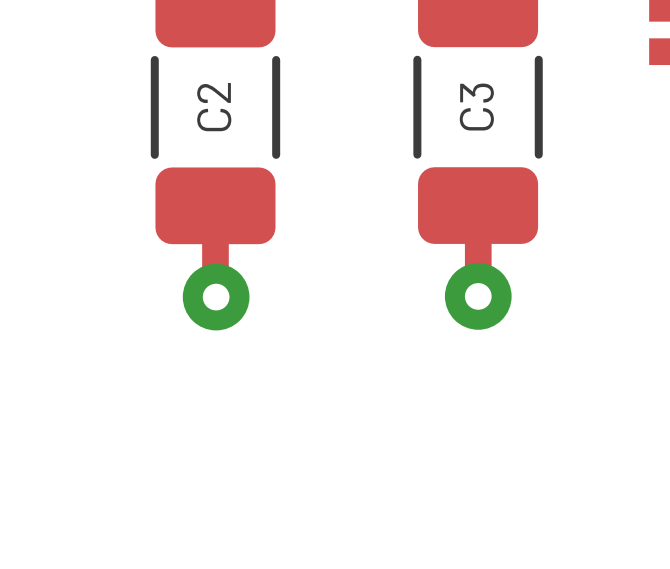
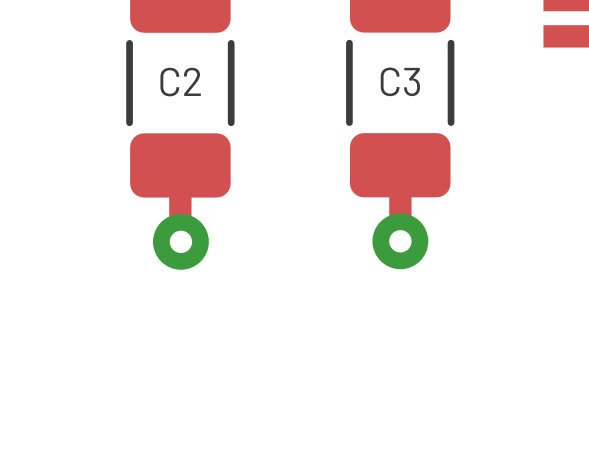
C2 name rotation: 0° (214, 107) -> 90° clockwise (180, 82)
C3 name rotation: 0° (476, 107) -> 90° clockwise (400, 81)

